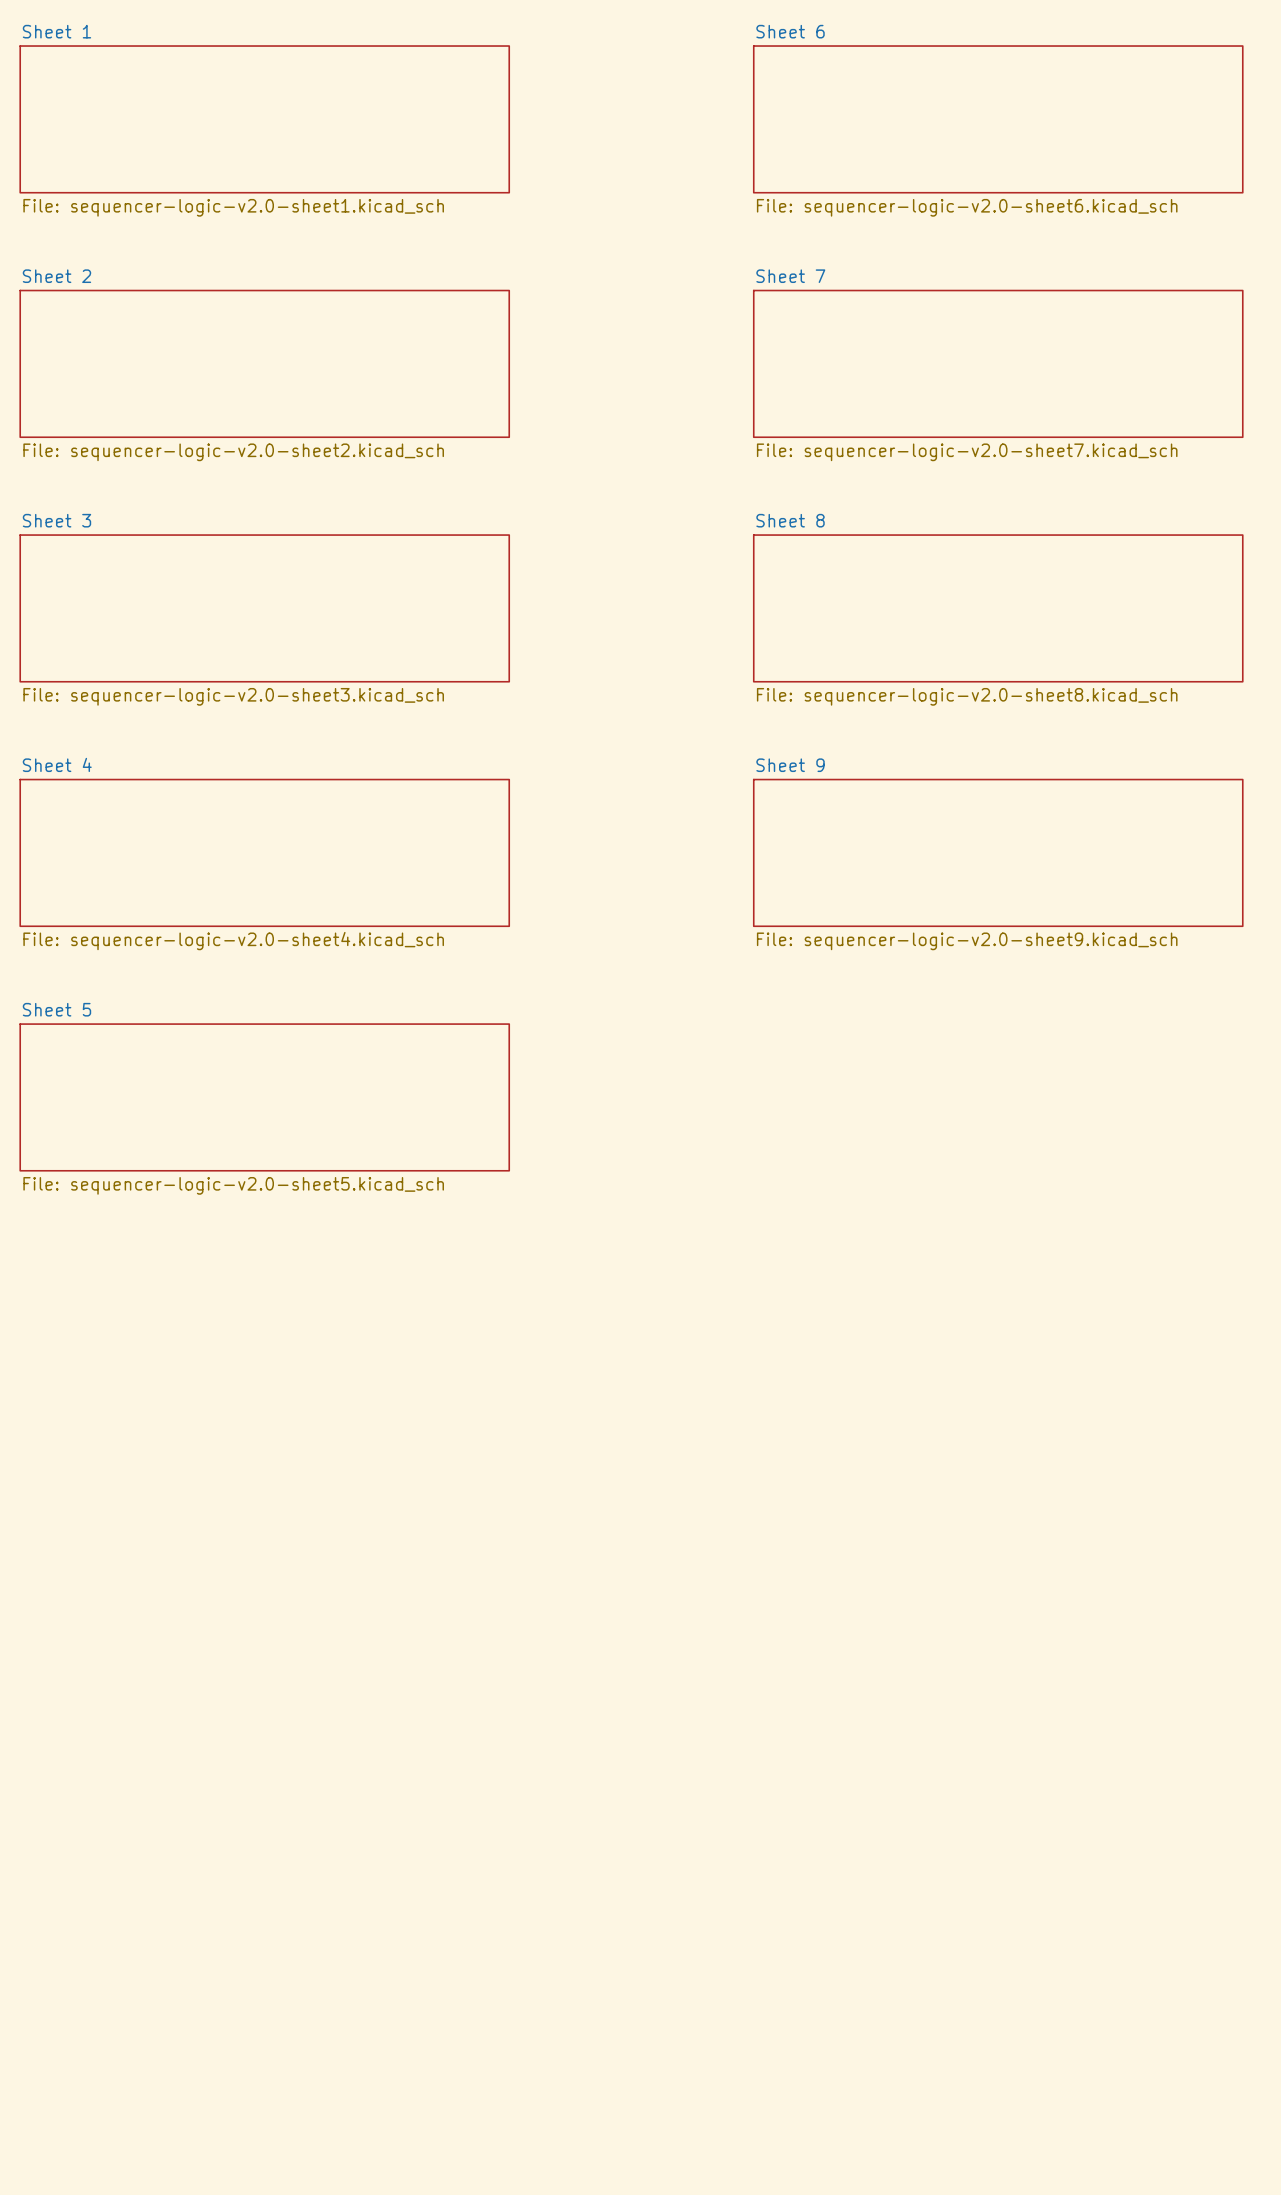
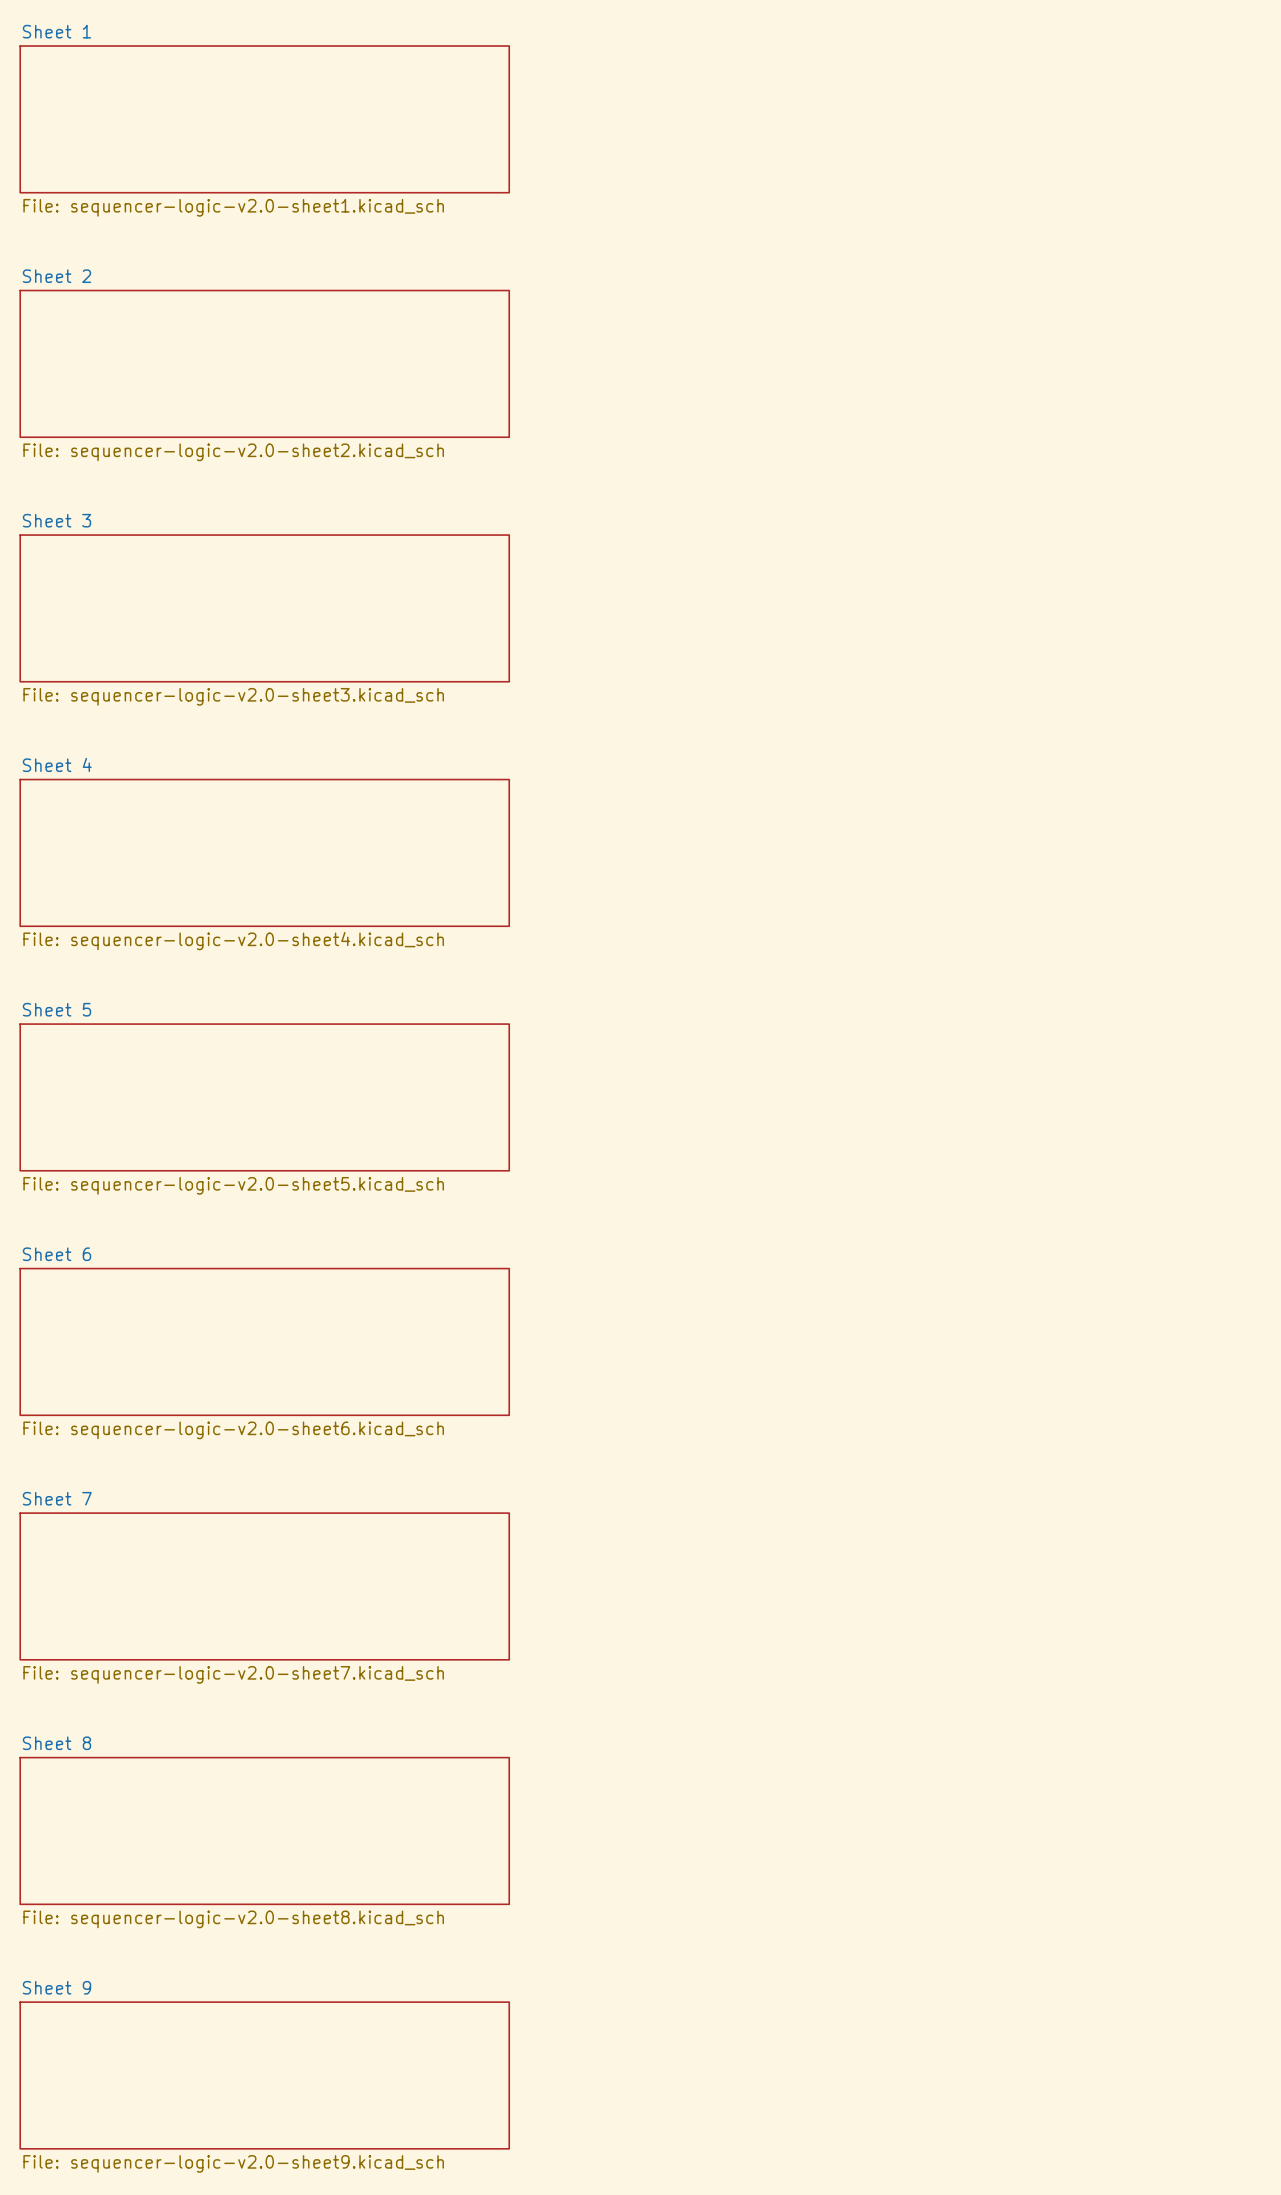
sheet Sheet 6 position: (998, 119) -> (264, 1341)
sheet Sheet 7 position: (998, 363) -> (264, 1586)
sheet Sheet 8 position: (998, 608) -> (264, 1830)
sheet Sheet 9 position: (998, 852) -> (264, 2075)

